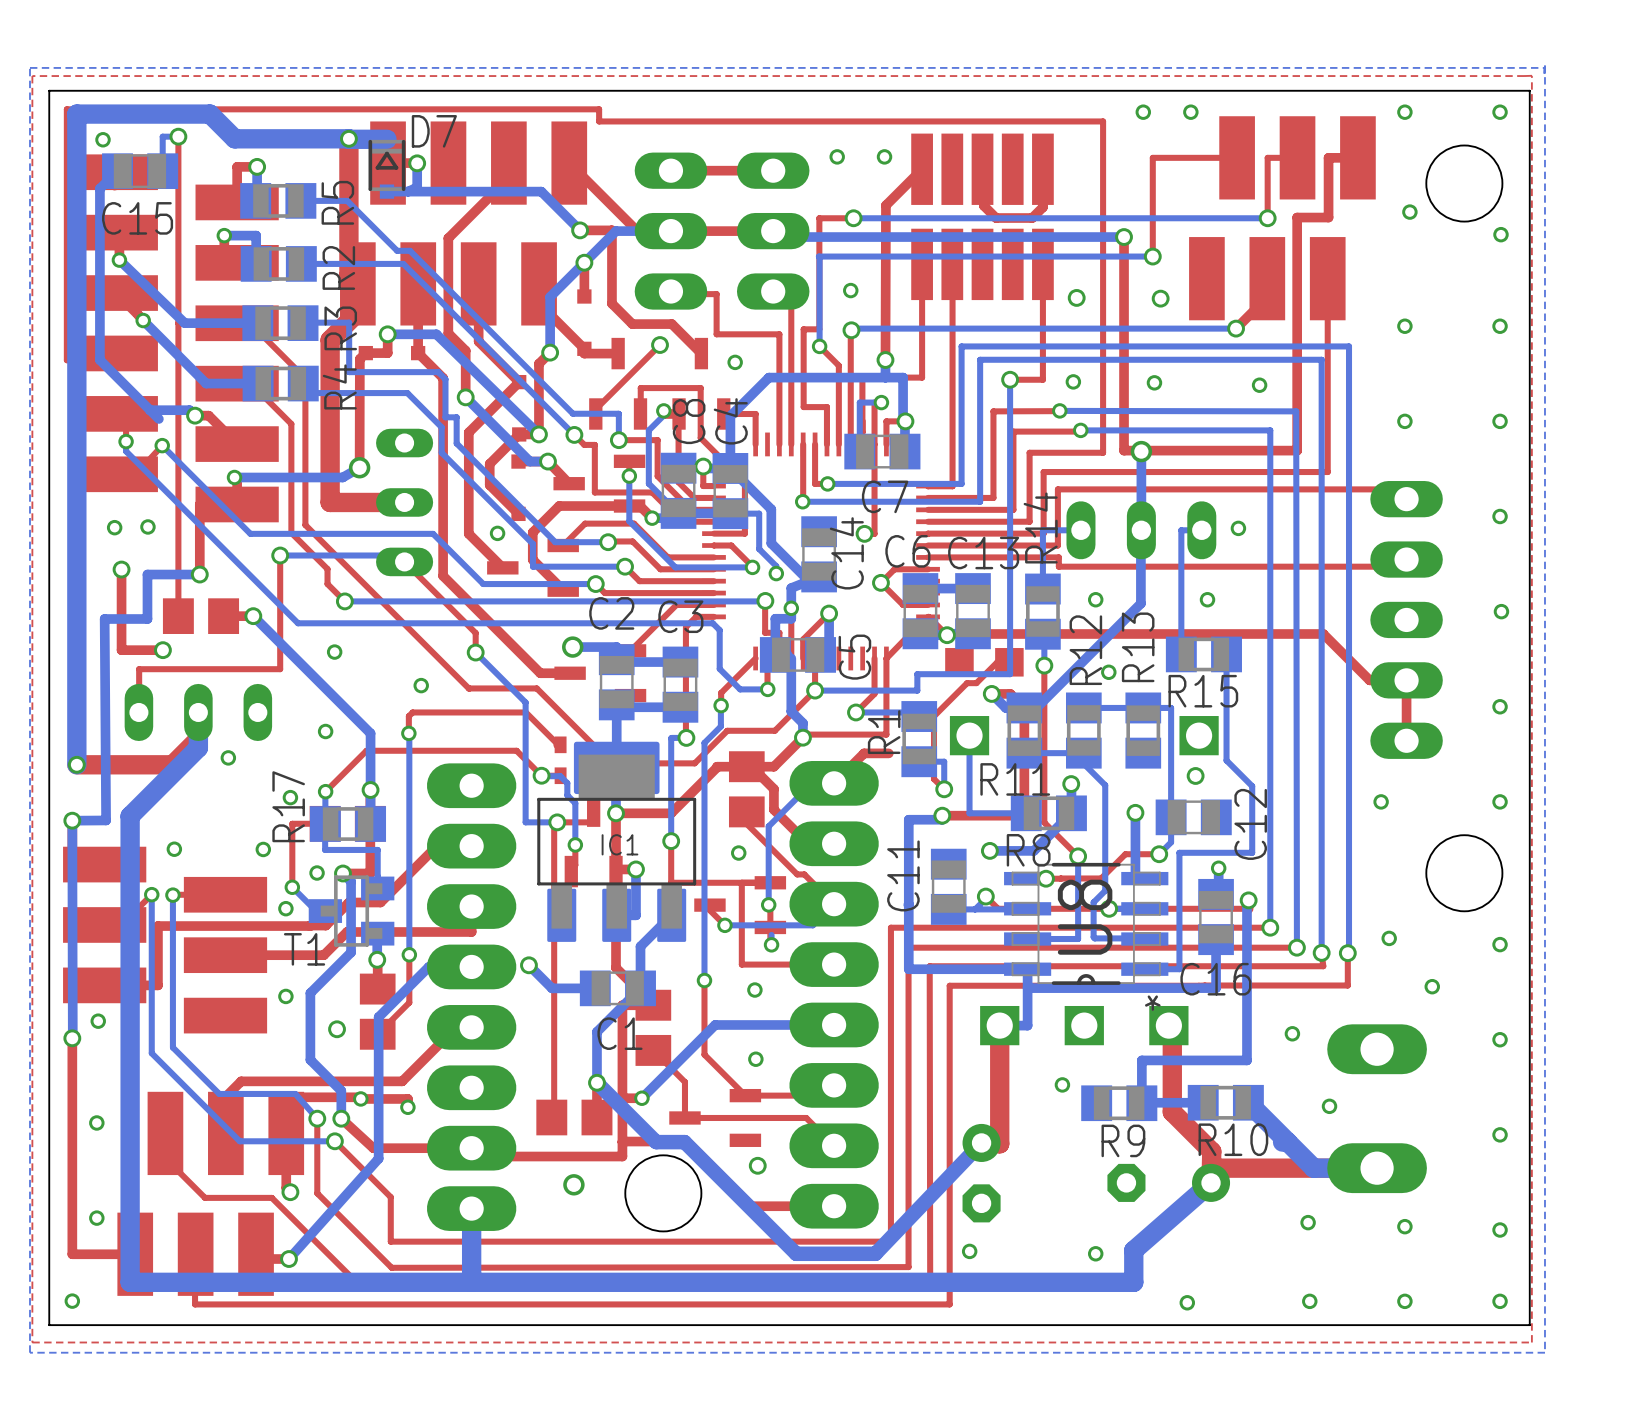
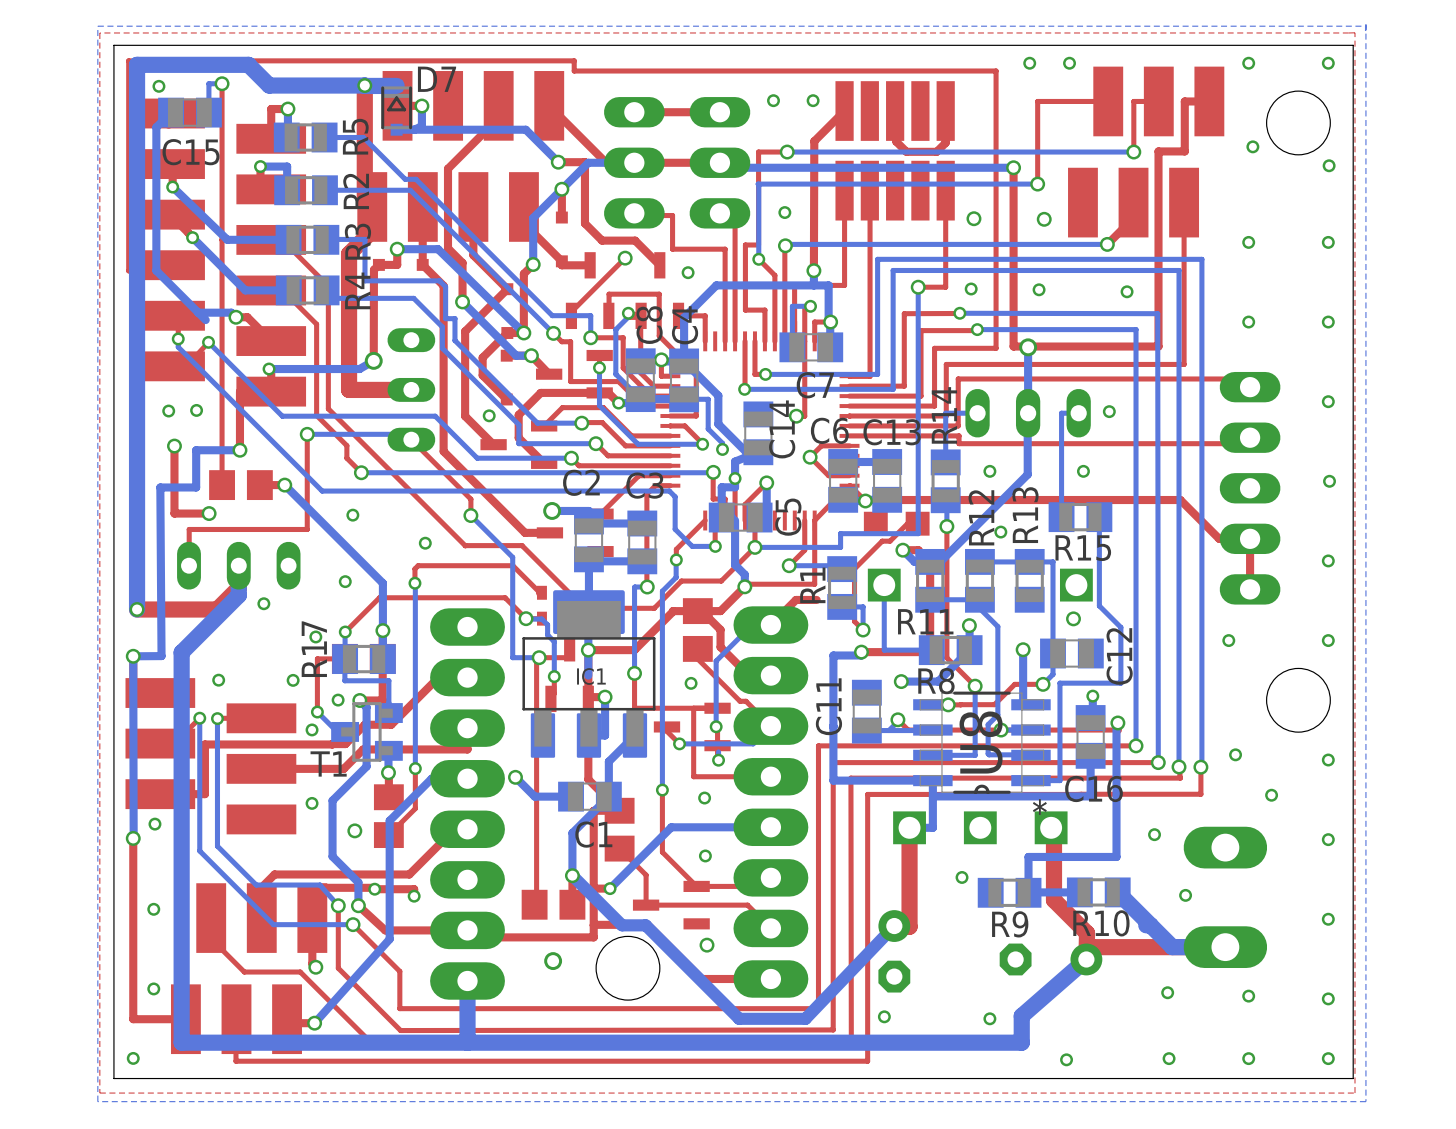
bottom track: none -> (588, 650) (588, 675)

